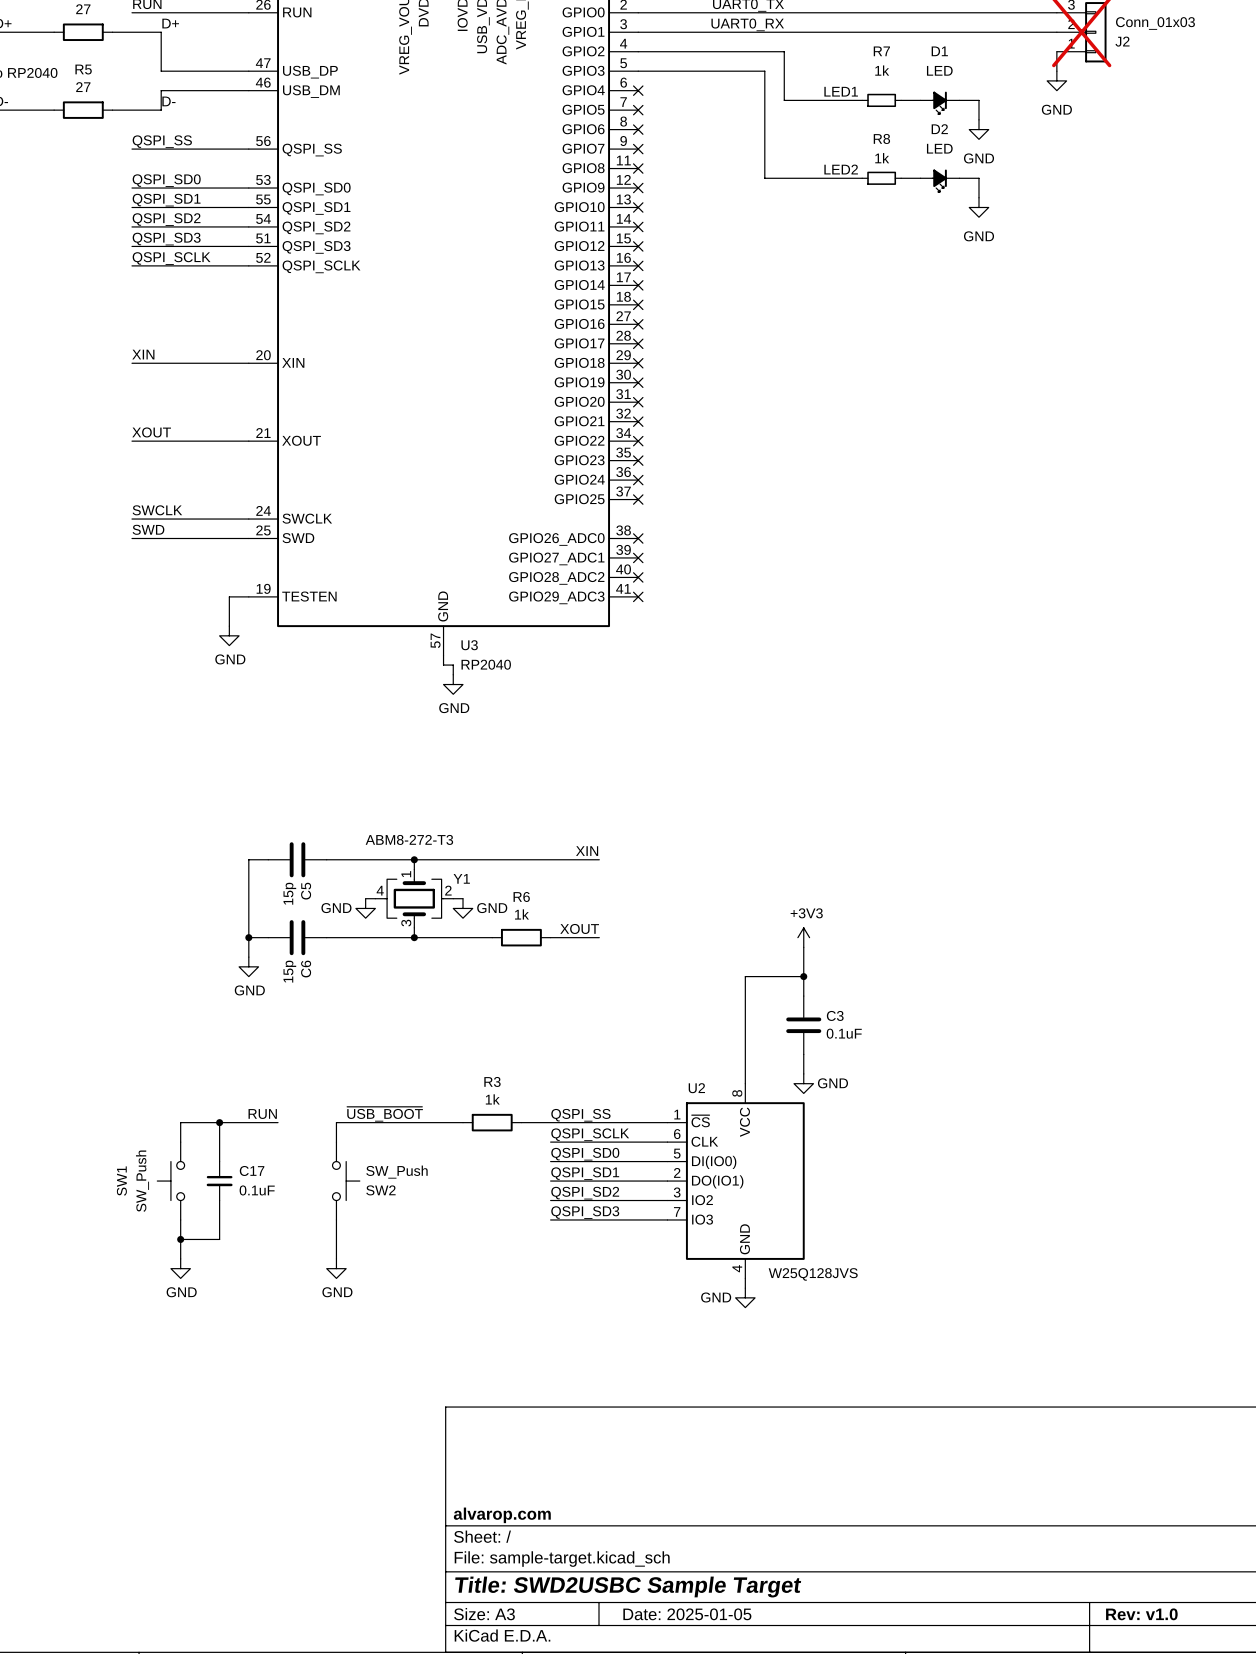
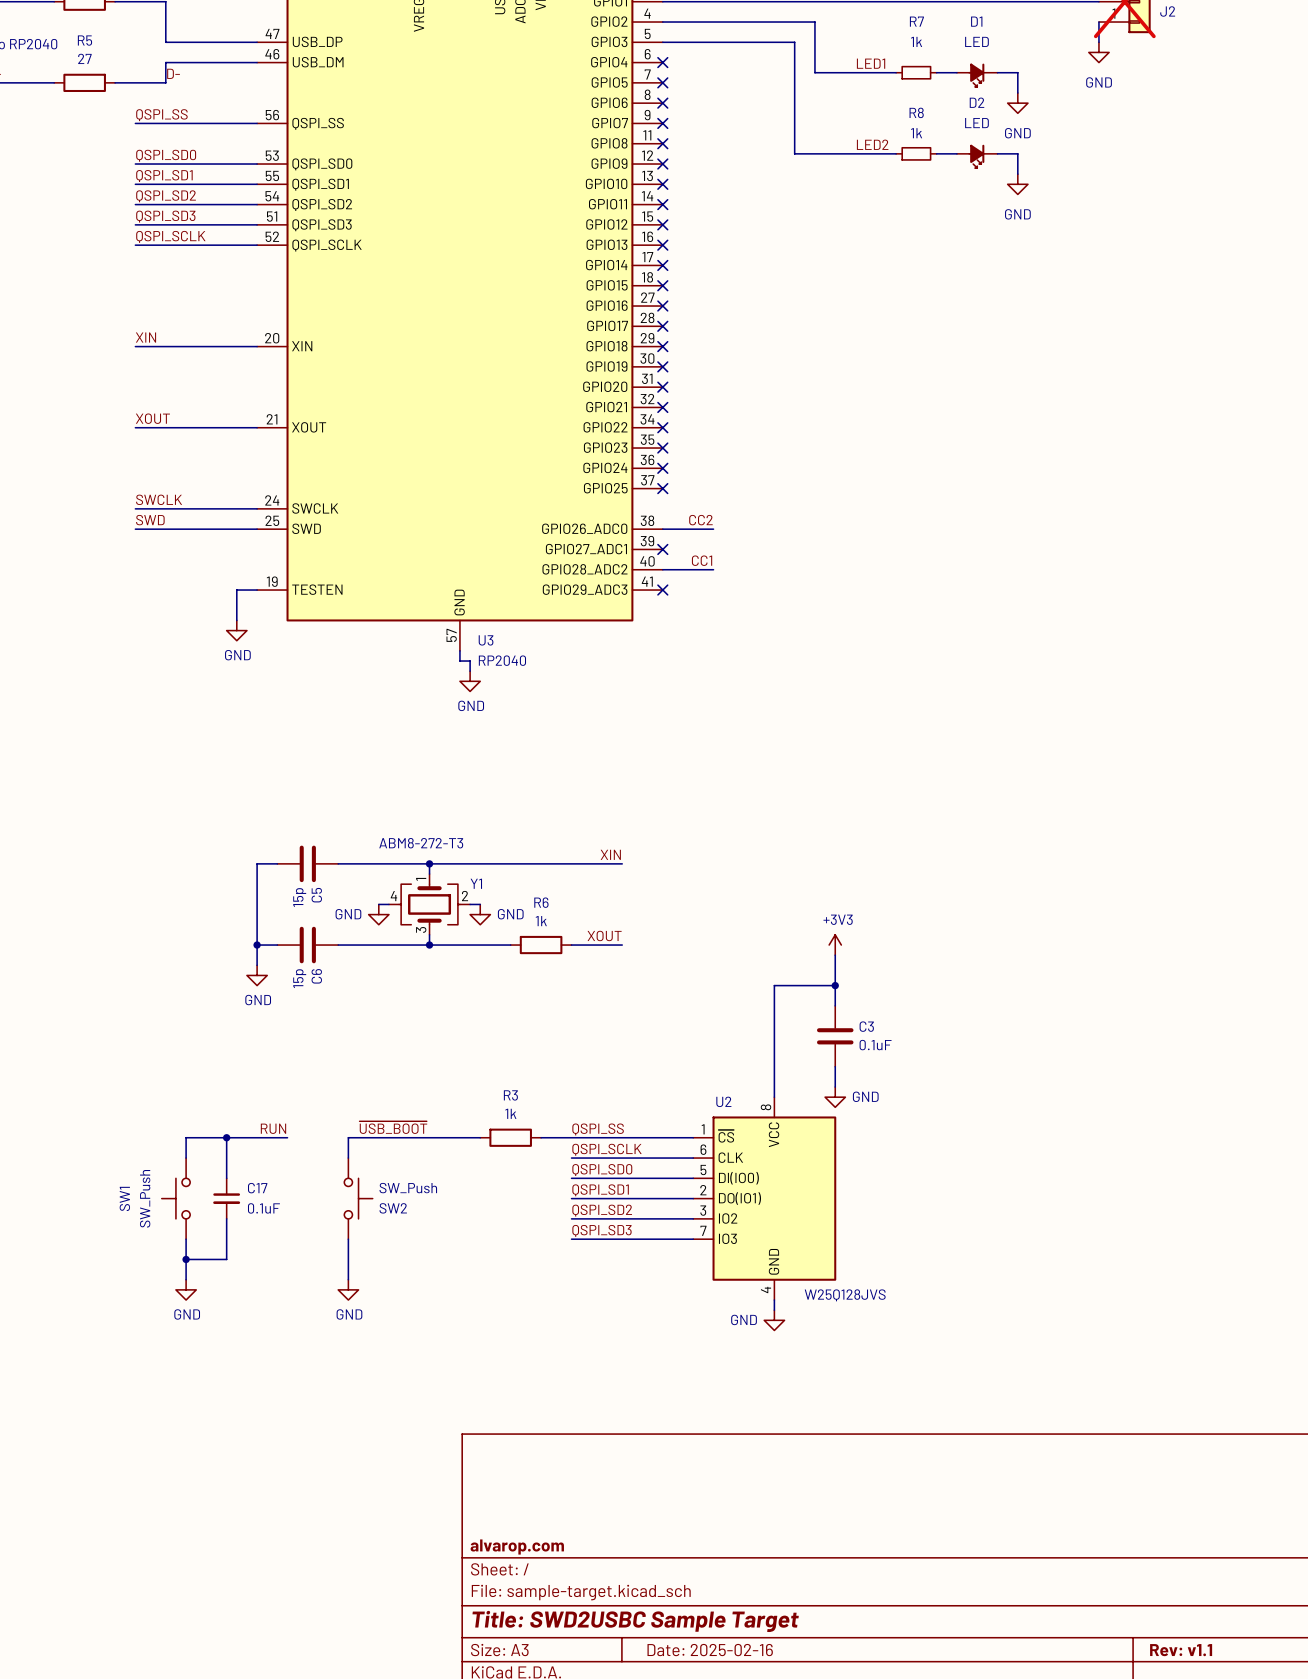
label: none -> CC2 (700, 520)
wire: none -> (662, 529) (713, 529)
no-connect mark: (638, 538) -> none
label: none -> CC1 (702, 560)
wire: none -> (662, 569) (713, 569)
no-connect mark: (638, 577) -> none
title block: Date: 2025-01-05 (687, 1614) -> Date: 2025-02-16 (710, 1650)
title block: Rev: v1.0 (1141, 1614) -> Rev: v1.1 (1181, 1650)

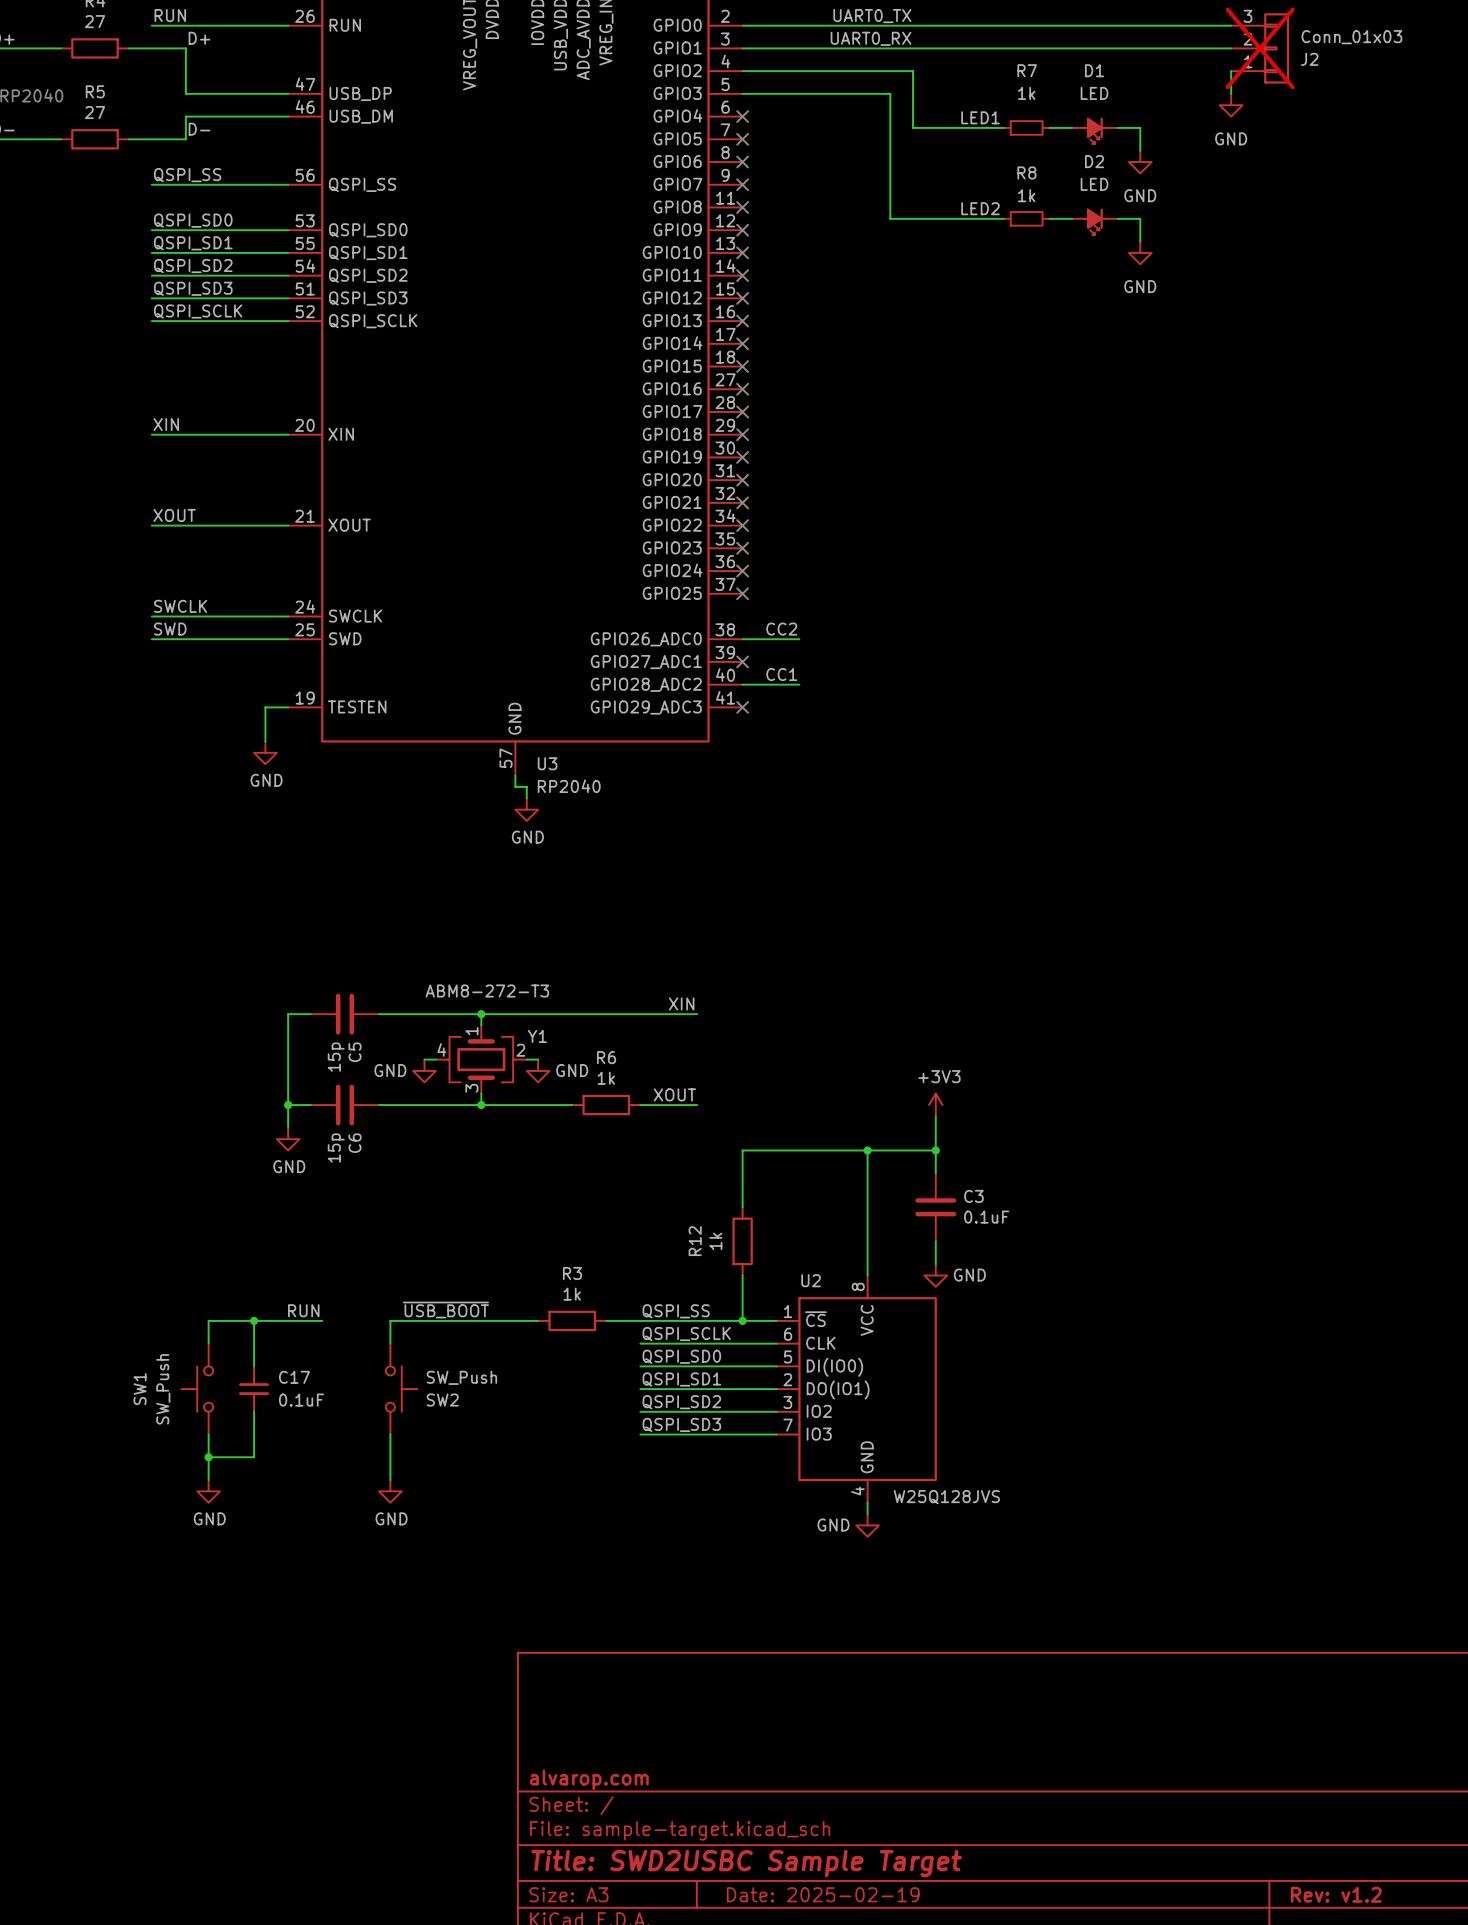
wire: none -> (867, 1150) (742, 1150) (742, 1207)
junction: none -> (867, 1150)
R12: none -> 1k (742, 1241)
wire: none -> (742, 1275) (742, 1320)
junction: none -> (742, 1320)
title block: Date: 2025-02-16 (710, 1650) -> Date: 2025-02-19 (823, 1894)
title block: Rev: v1.1 (1181, 1650) -> Rev: v1.2 (1336, 1894)

